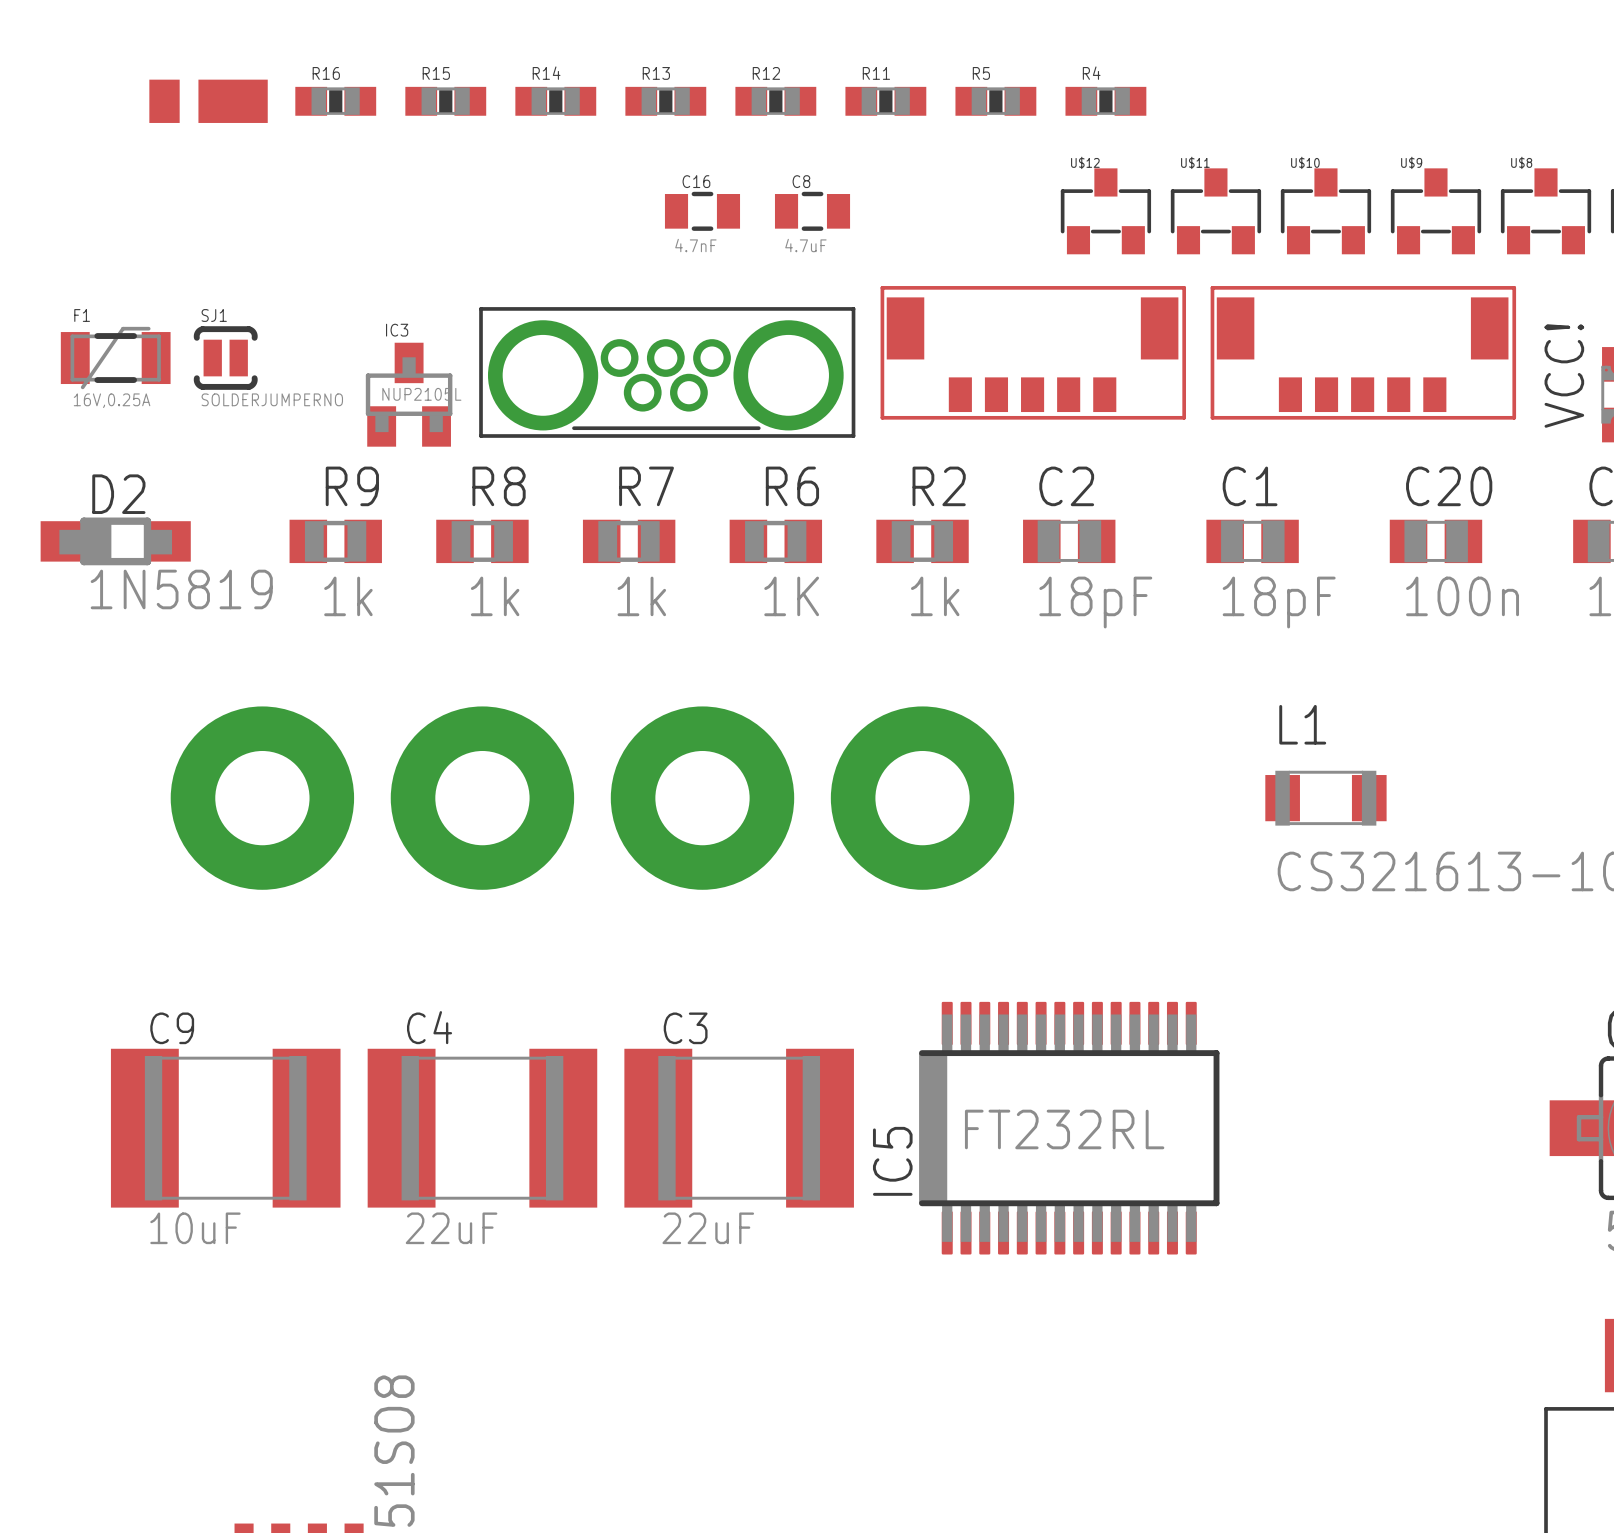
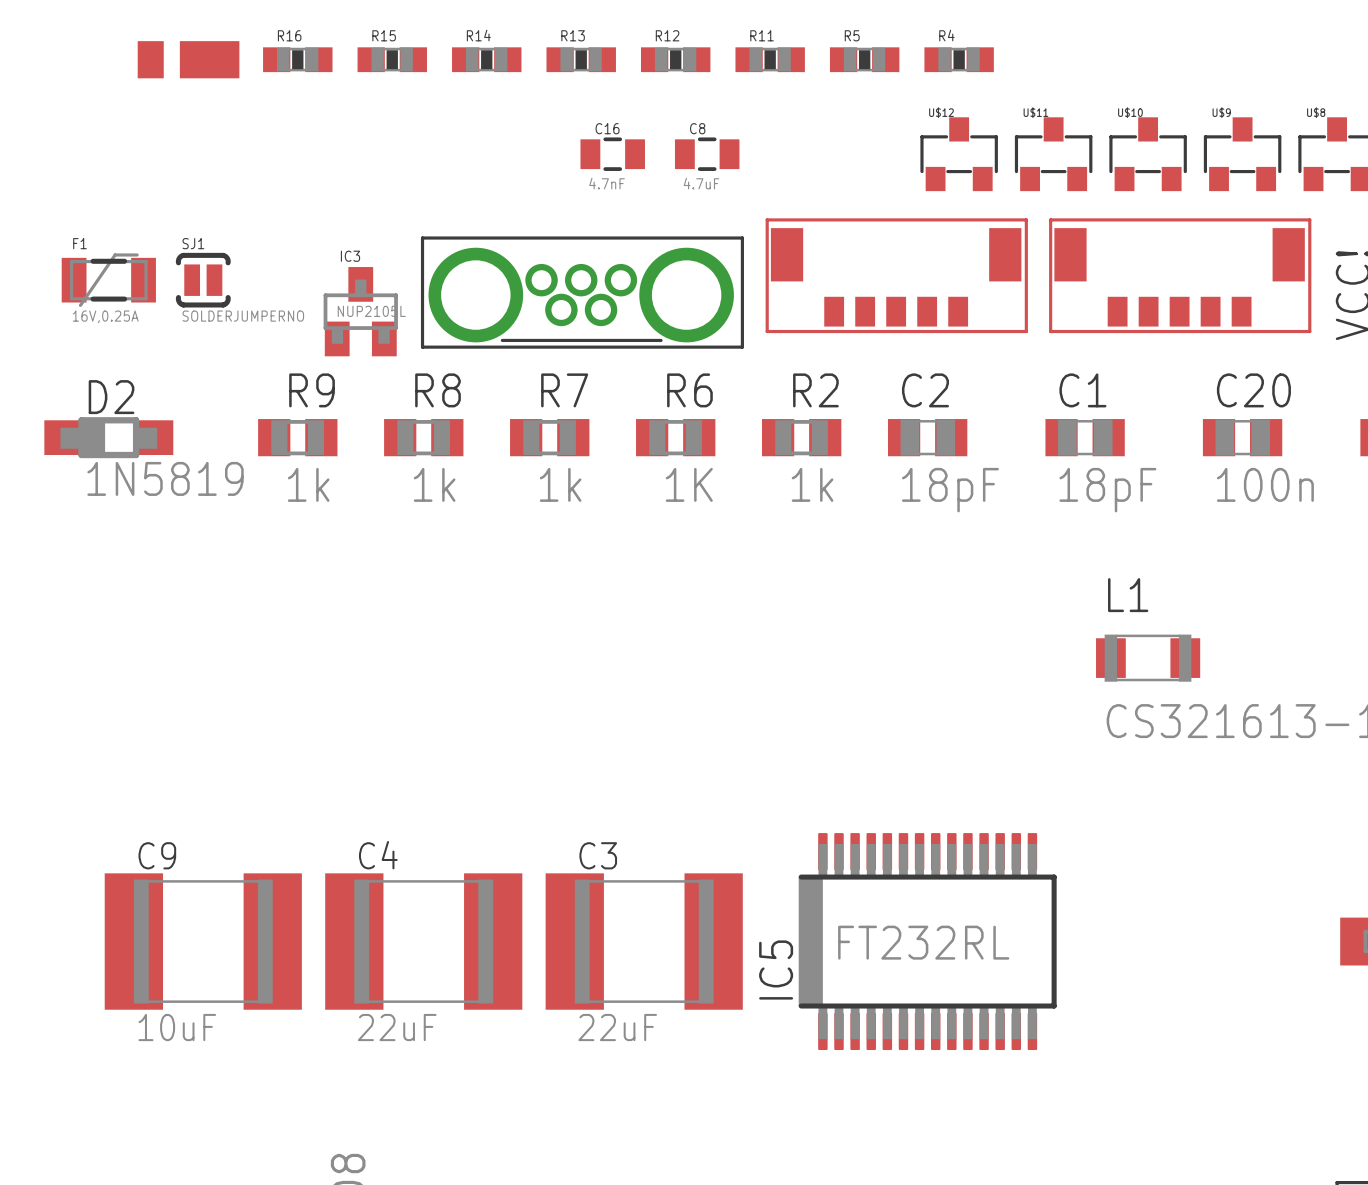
part: (262, 798) -> none
part: (482, 798) -> none
part: (702, 798) -> none
part: (922, 798) -> none

